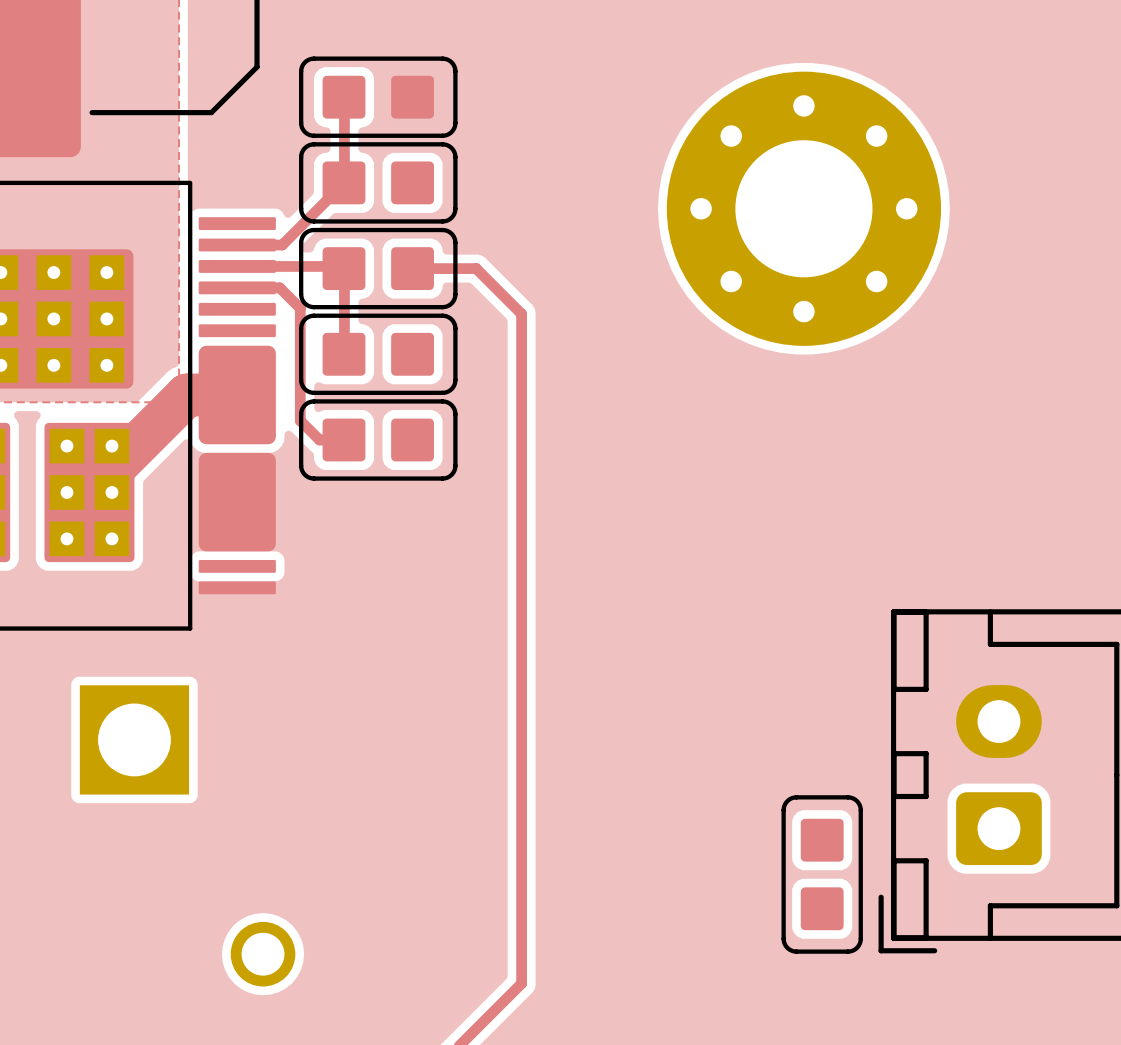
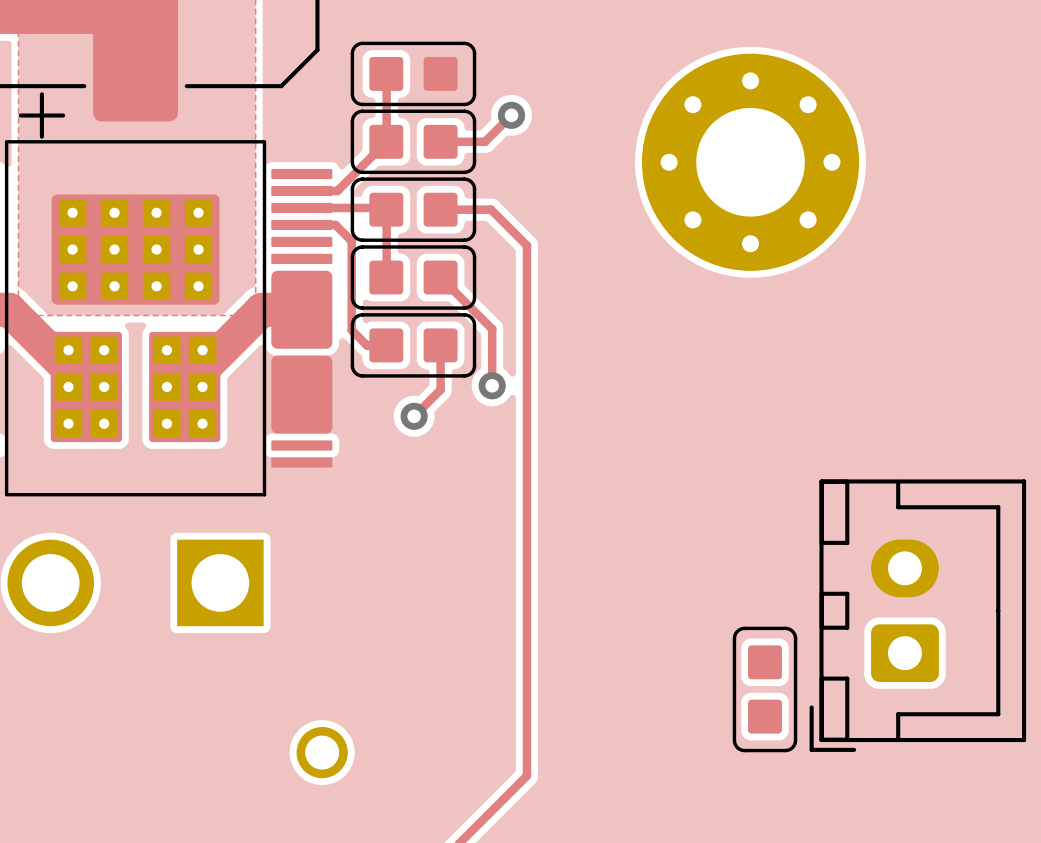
track: none -> (511, 115) (485, 141) (440, 141)
via: none -> (511, 115)
track: none -> (440, 277) (492, 329) (492, 385)
track: none -> (440, 345) (440, 389) (414, 416)
via: none -> (492, 385)
via: none -> (414, 416)

